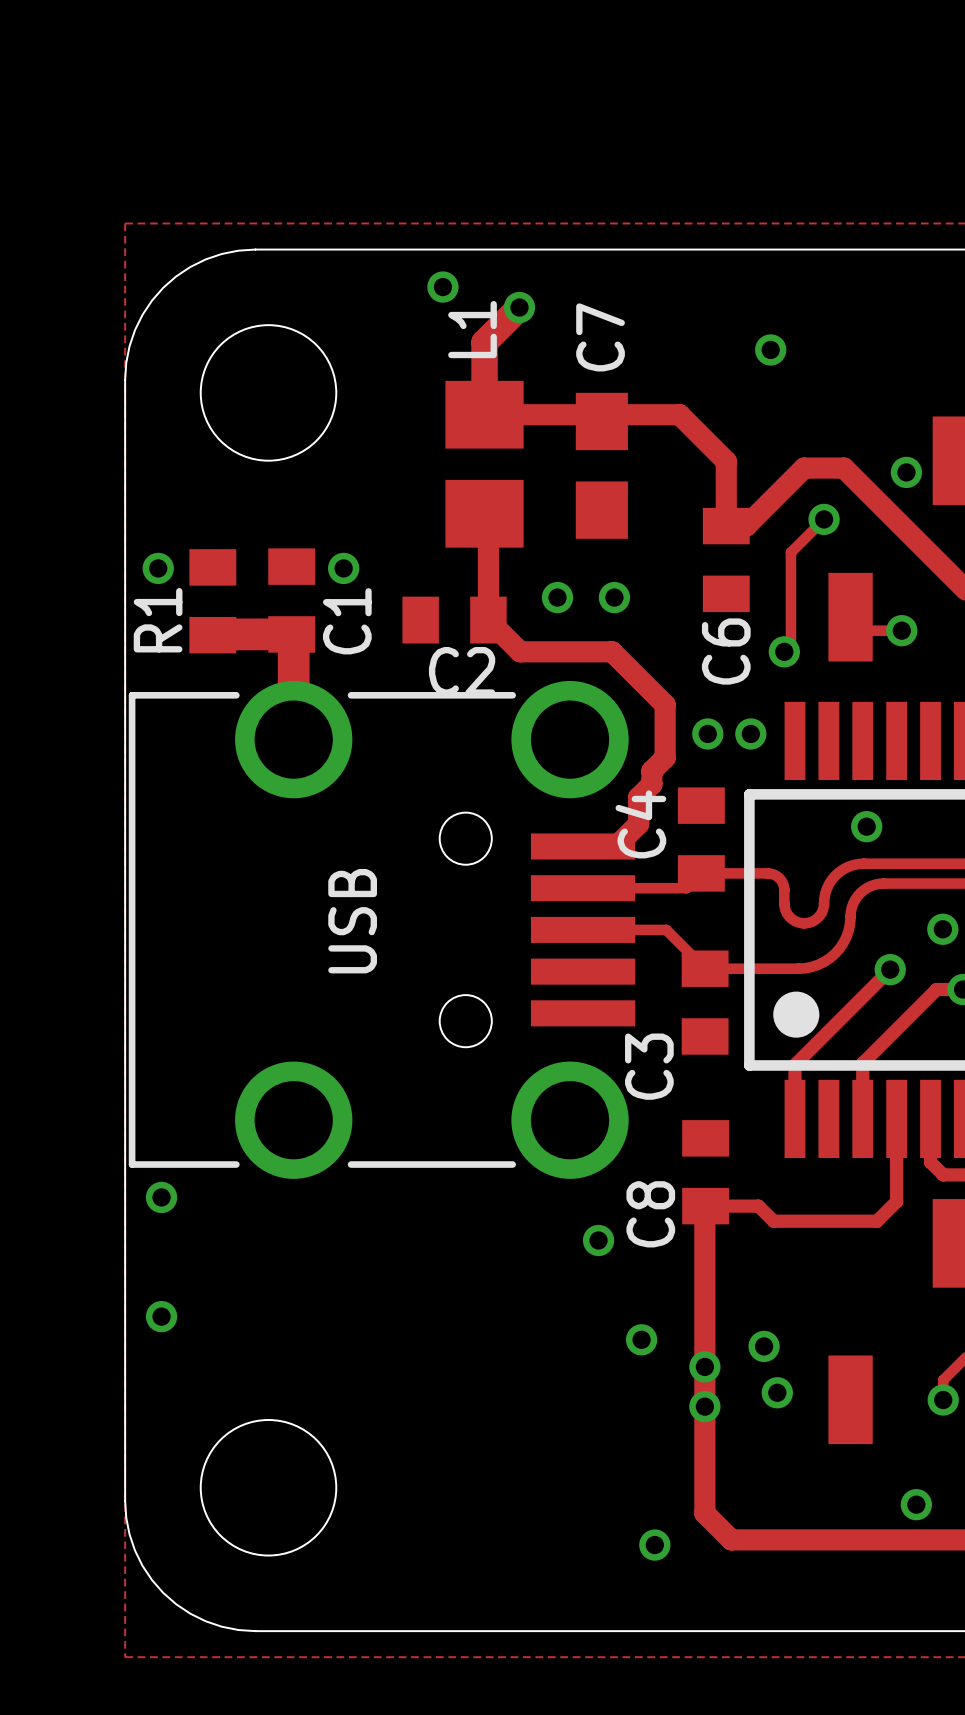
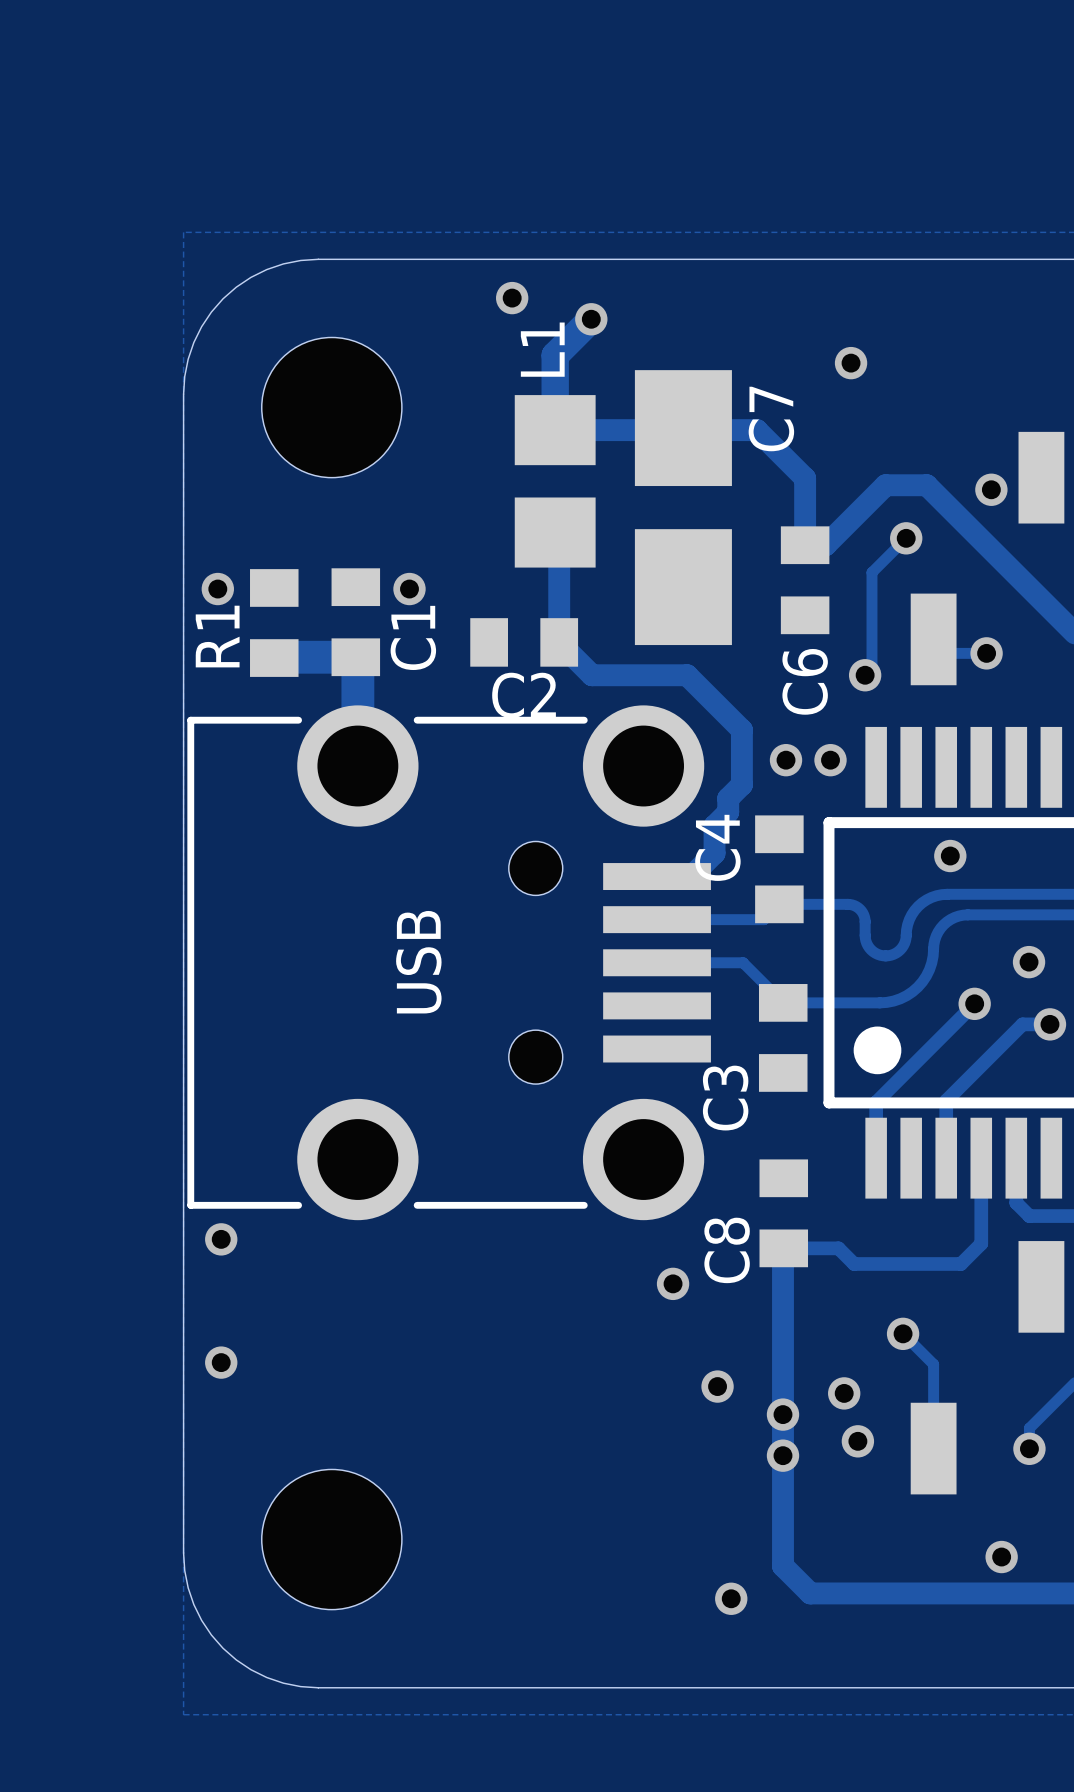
C7 footprint: [575, 392, 628, 539] -> [634, 370, 732, 646]
via: (557, 597) -> none
via: (614, 597) -> none
track: none -> (903, 1333) (933, 1364) (933, 1448)
via: none -> (903, 1333)

